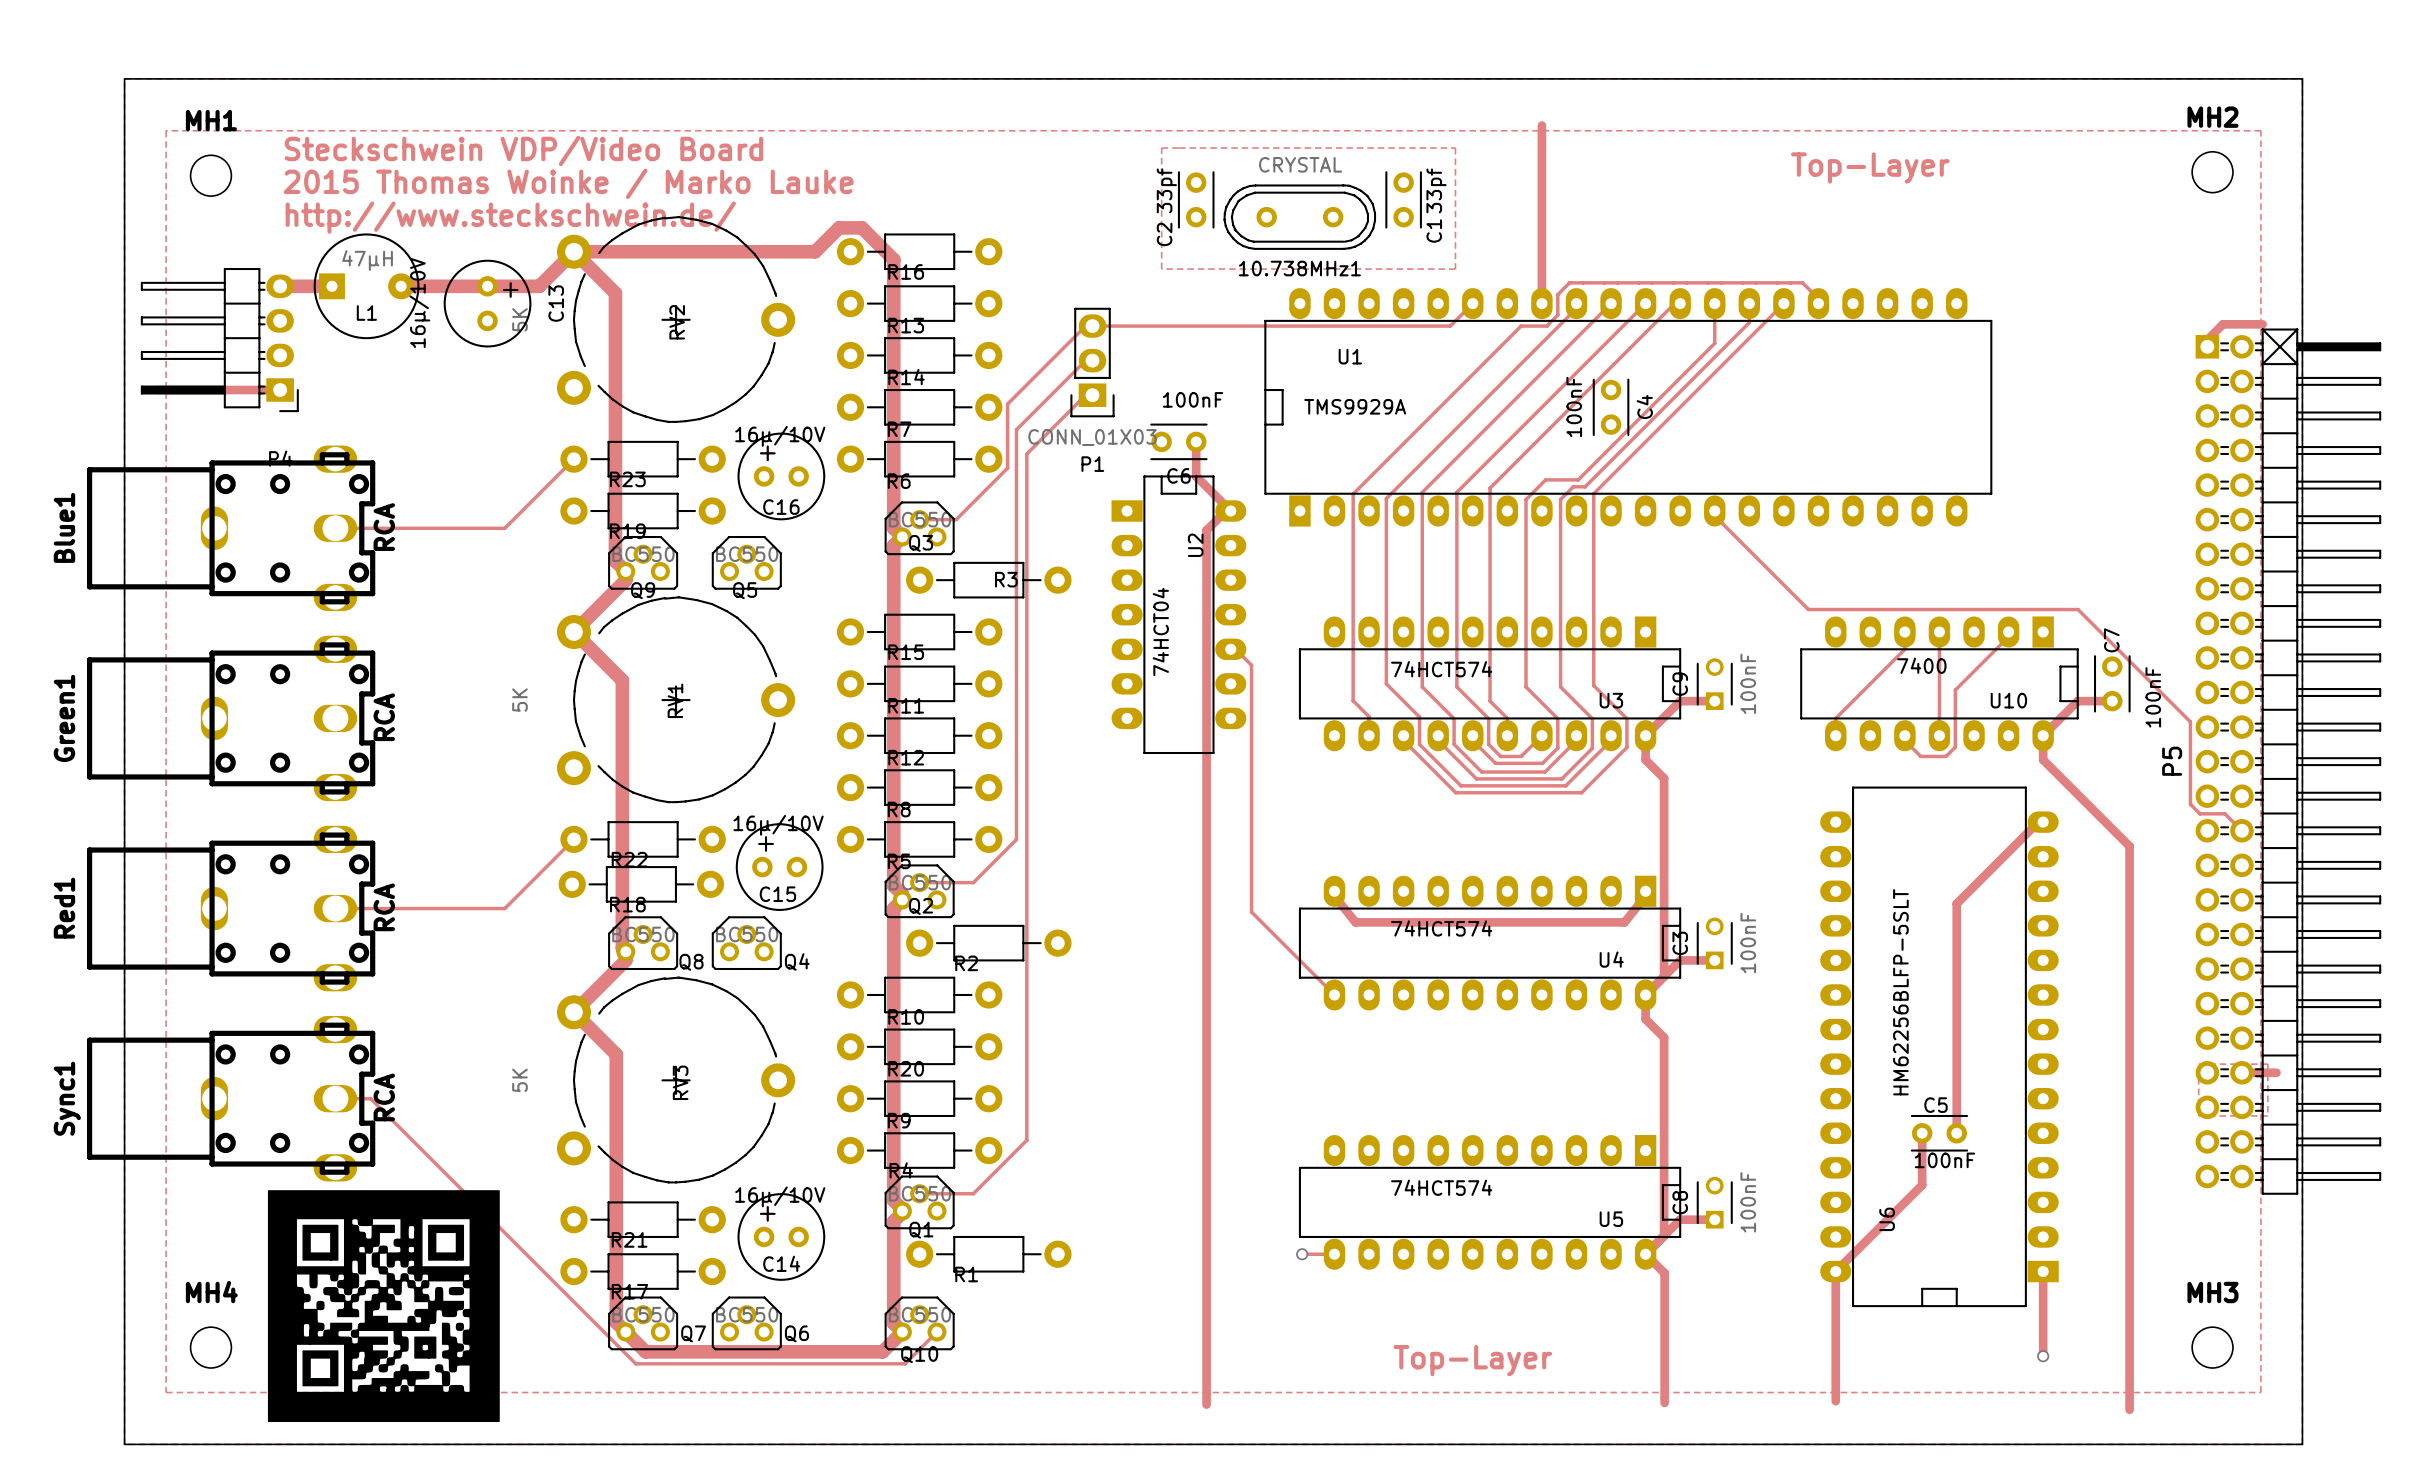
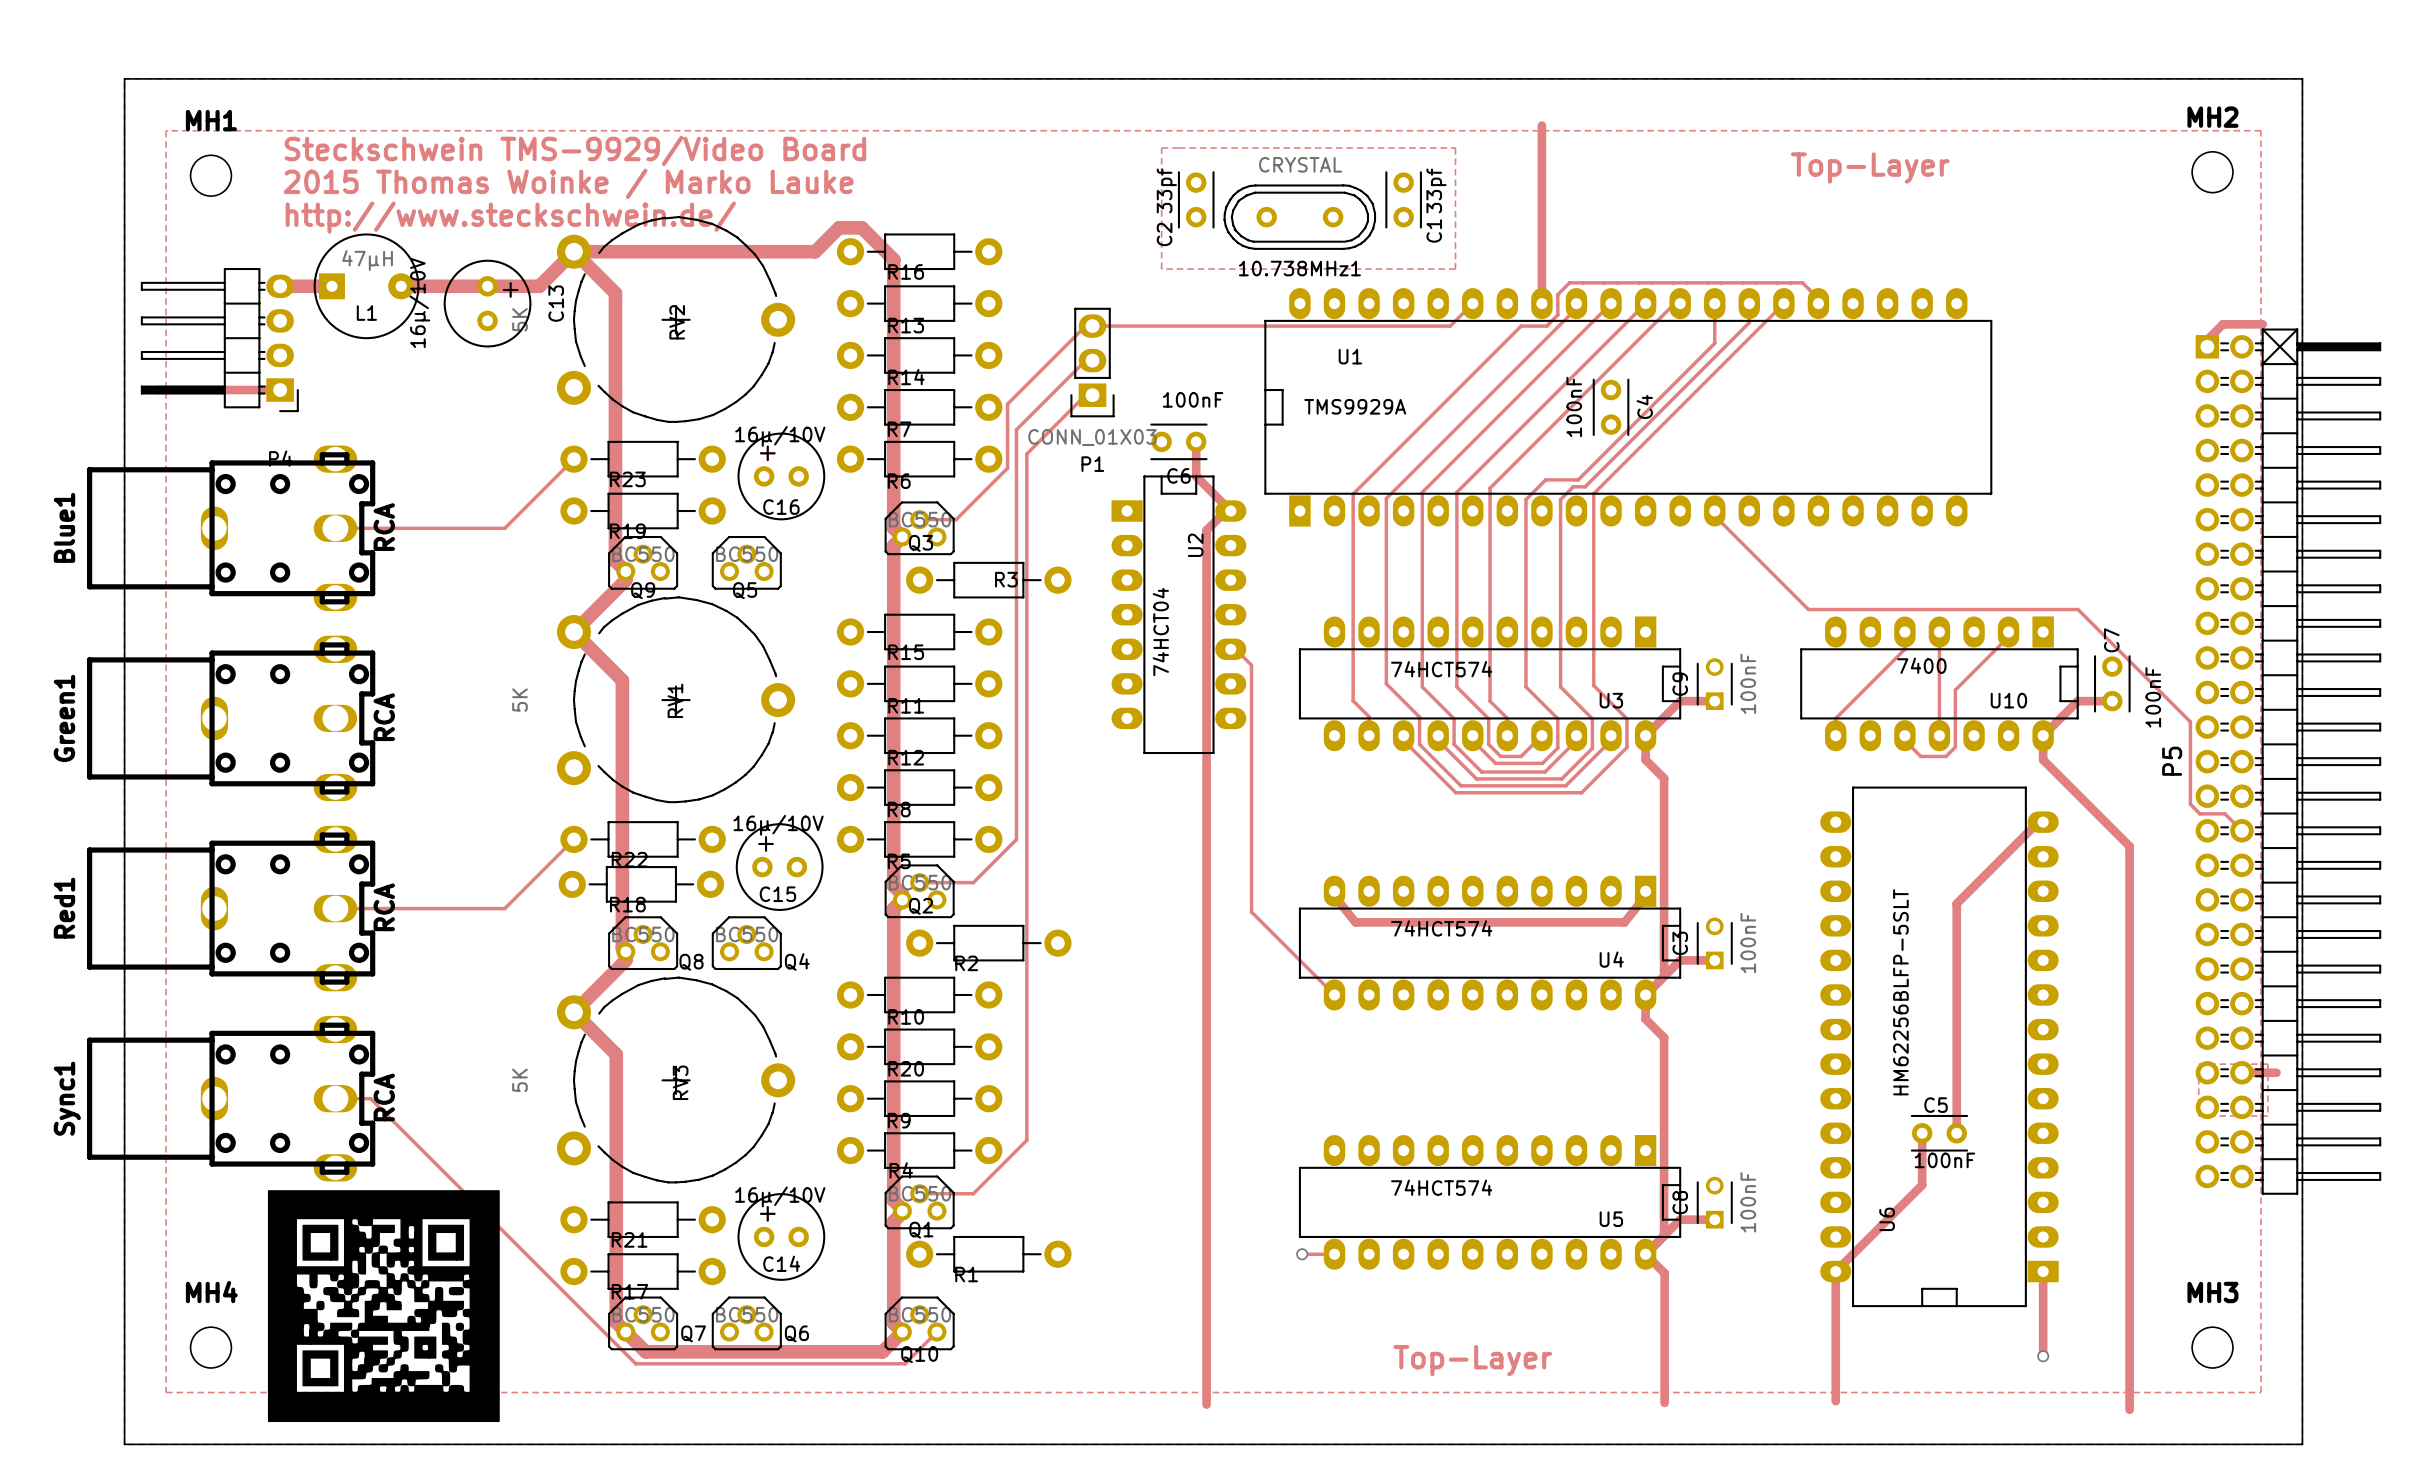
text: Steckschwein VDP/Video Board (523, 150) -> Steckschwein TMS-9929/Video Board (575, 150)

